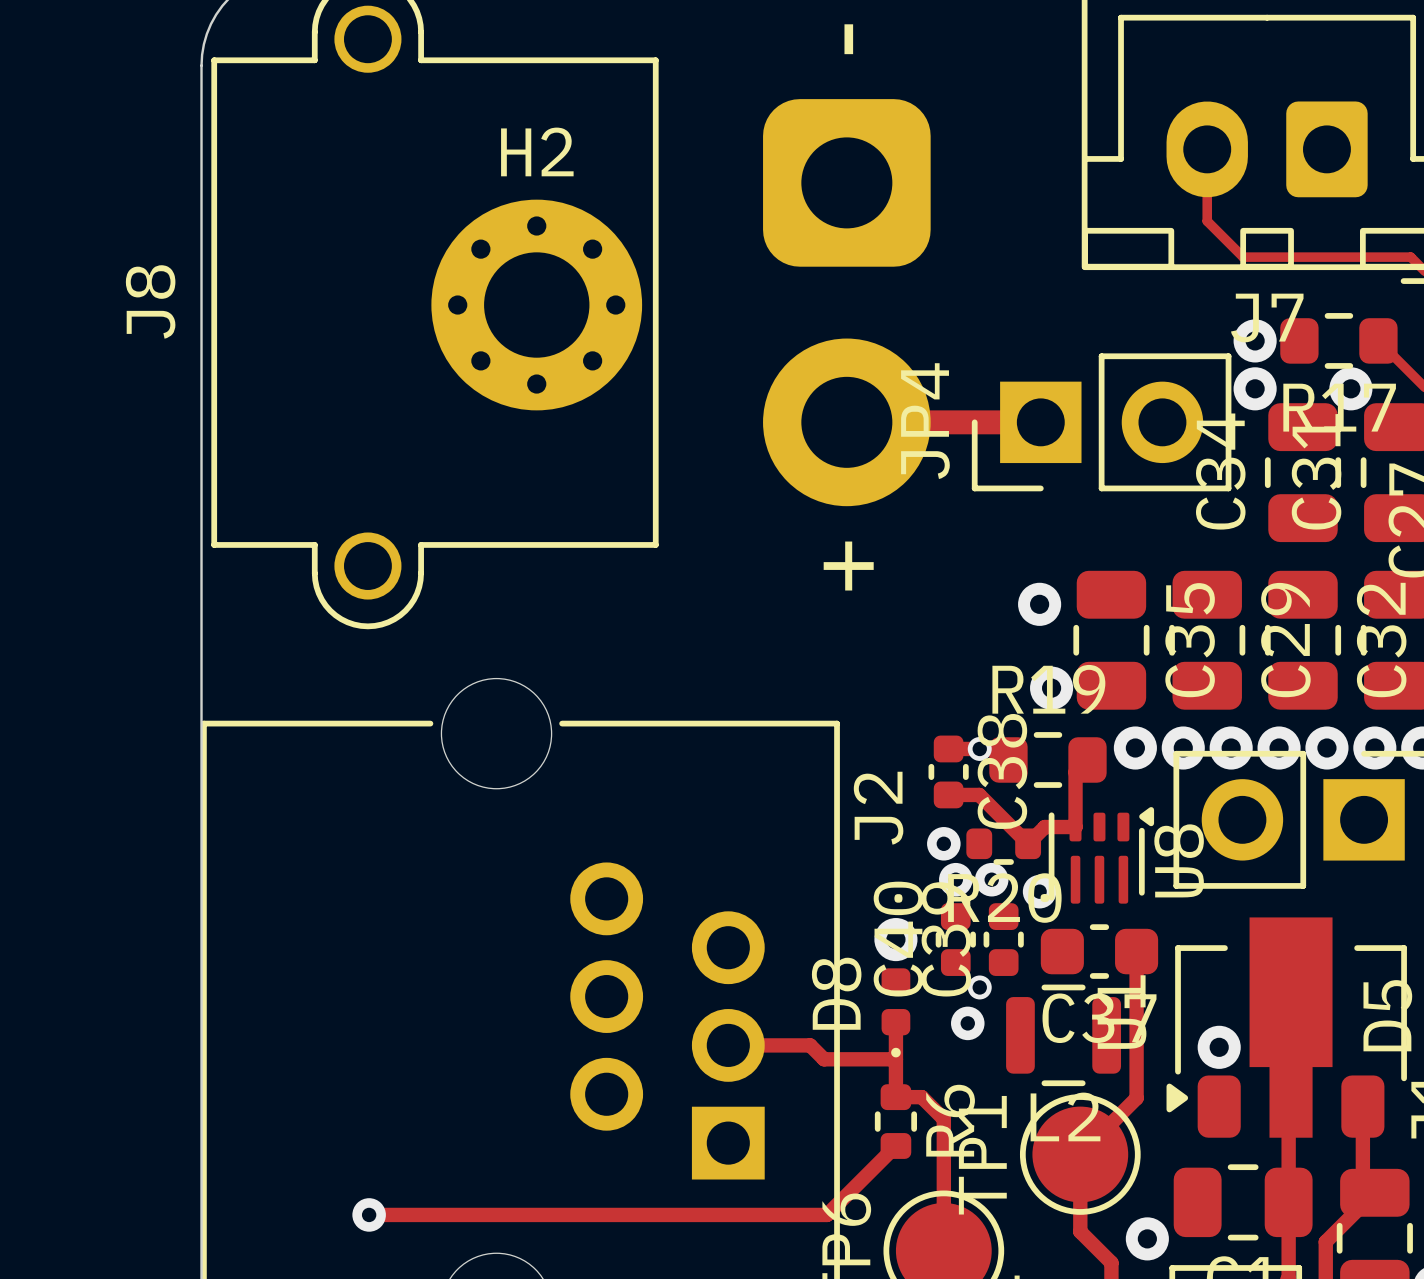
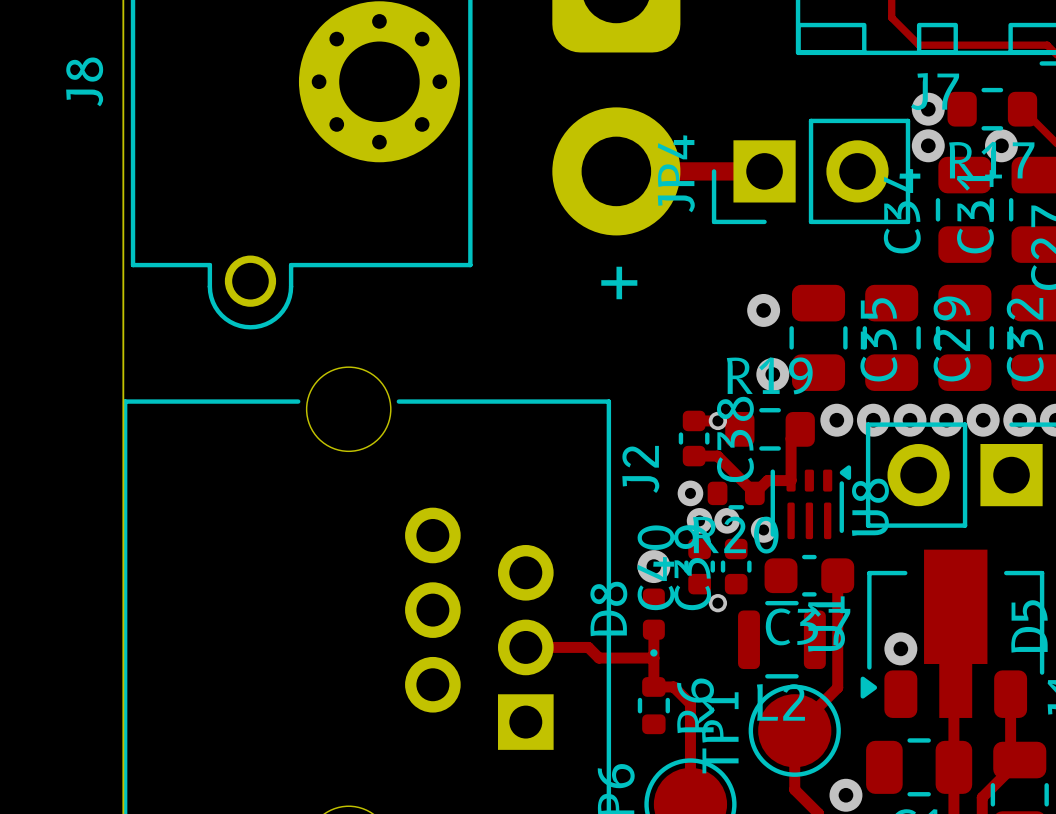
via: (967, 1023) -> none
track: (895, 1145) (826, 1214) (369, 1214) -> none
via: (369, 1214) -> none

